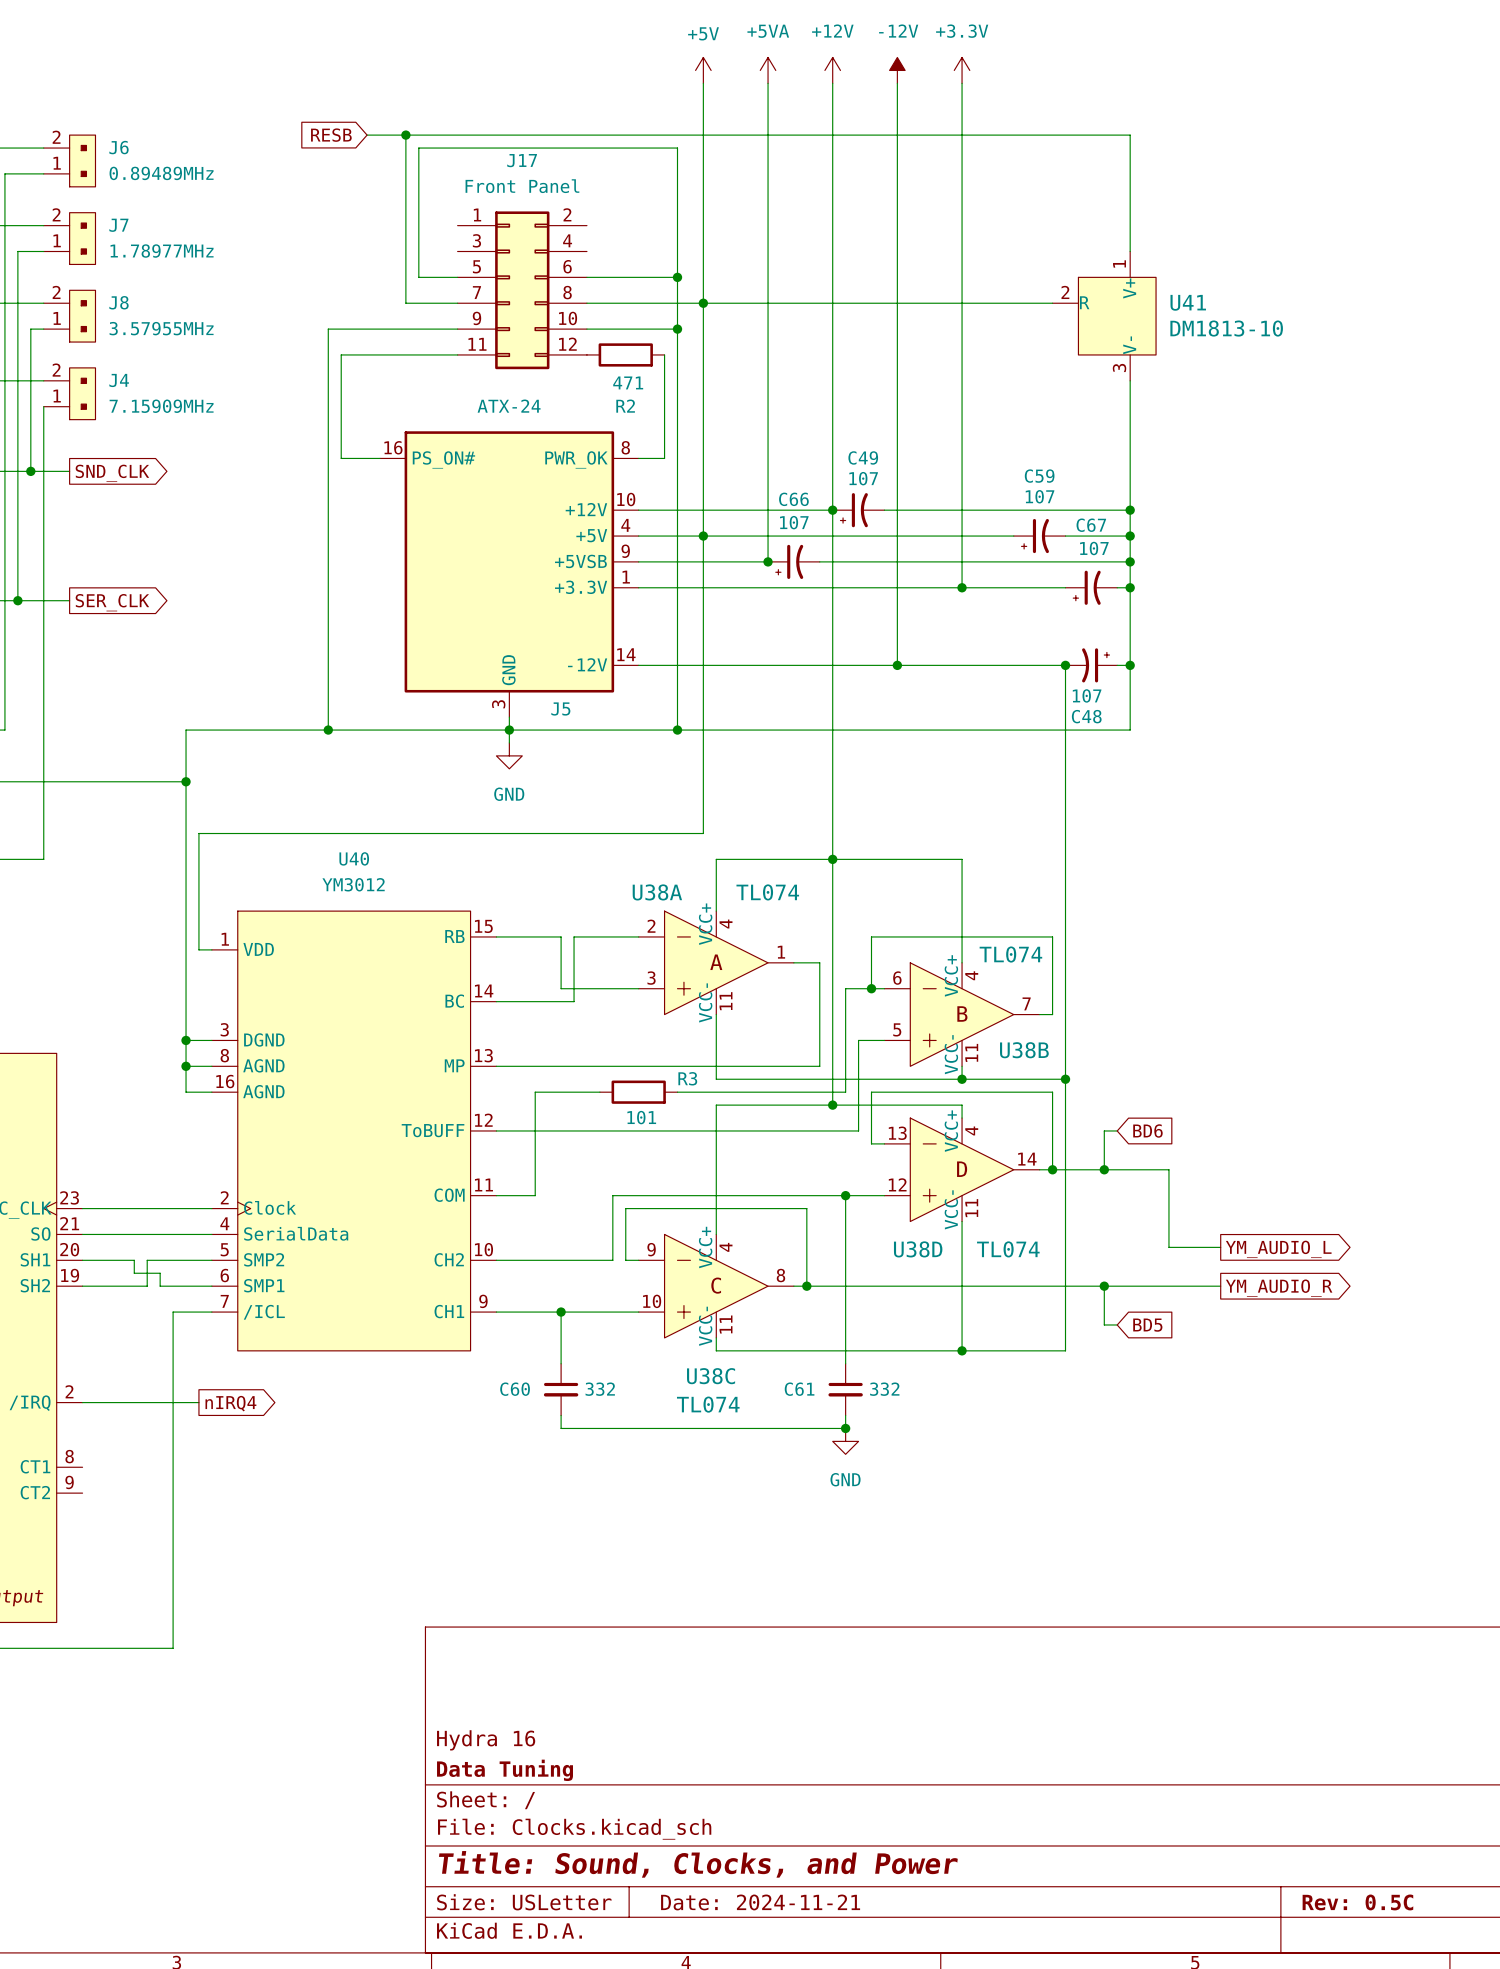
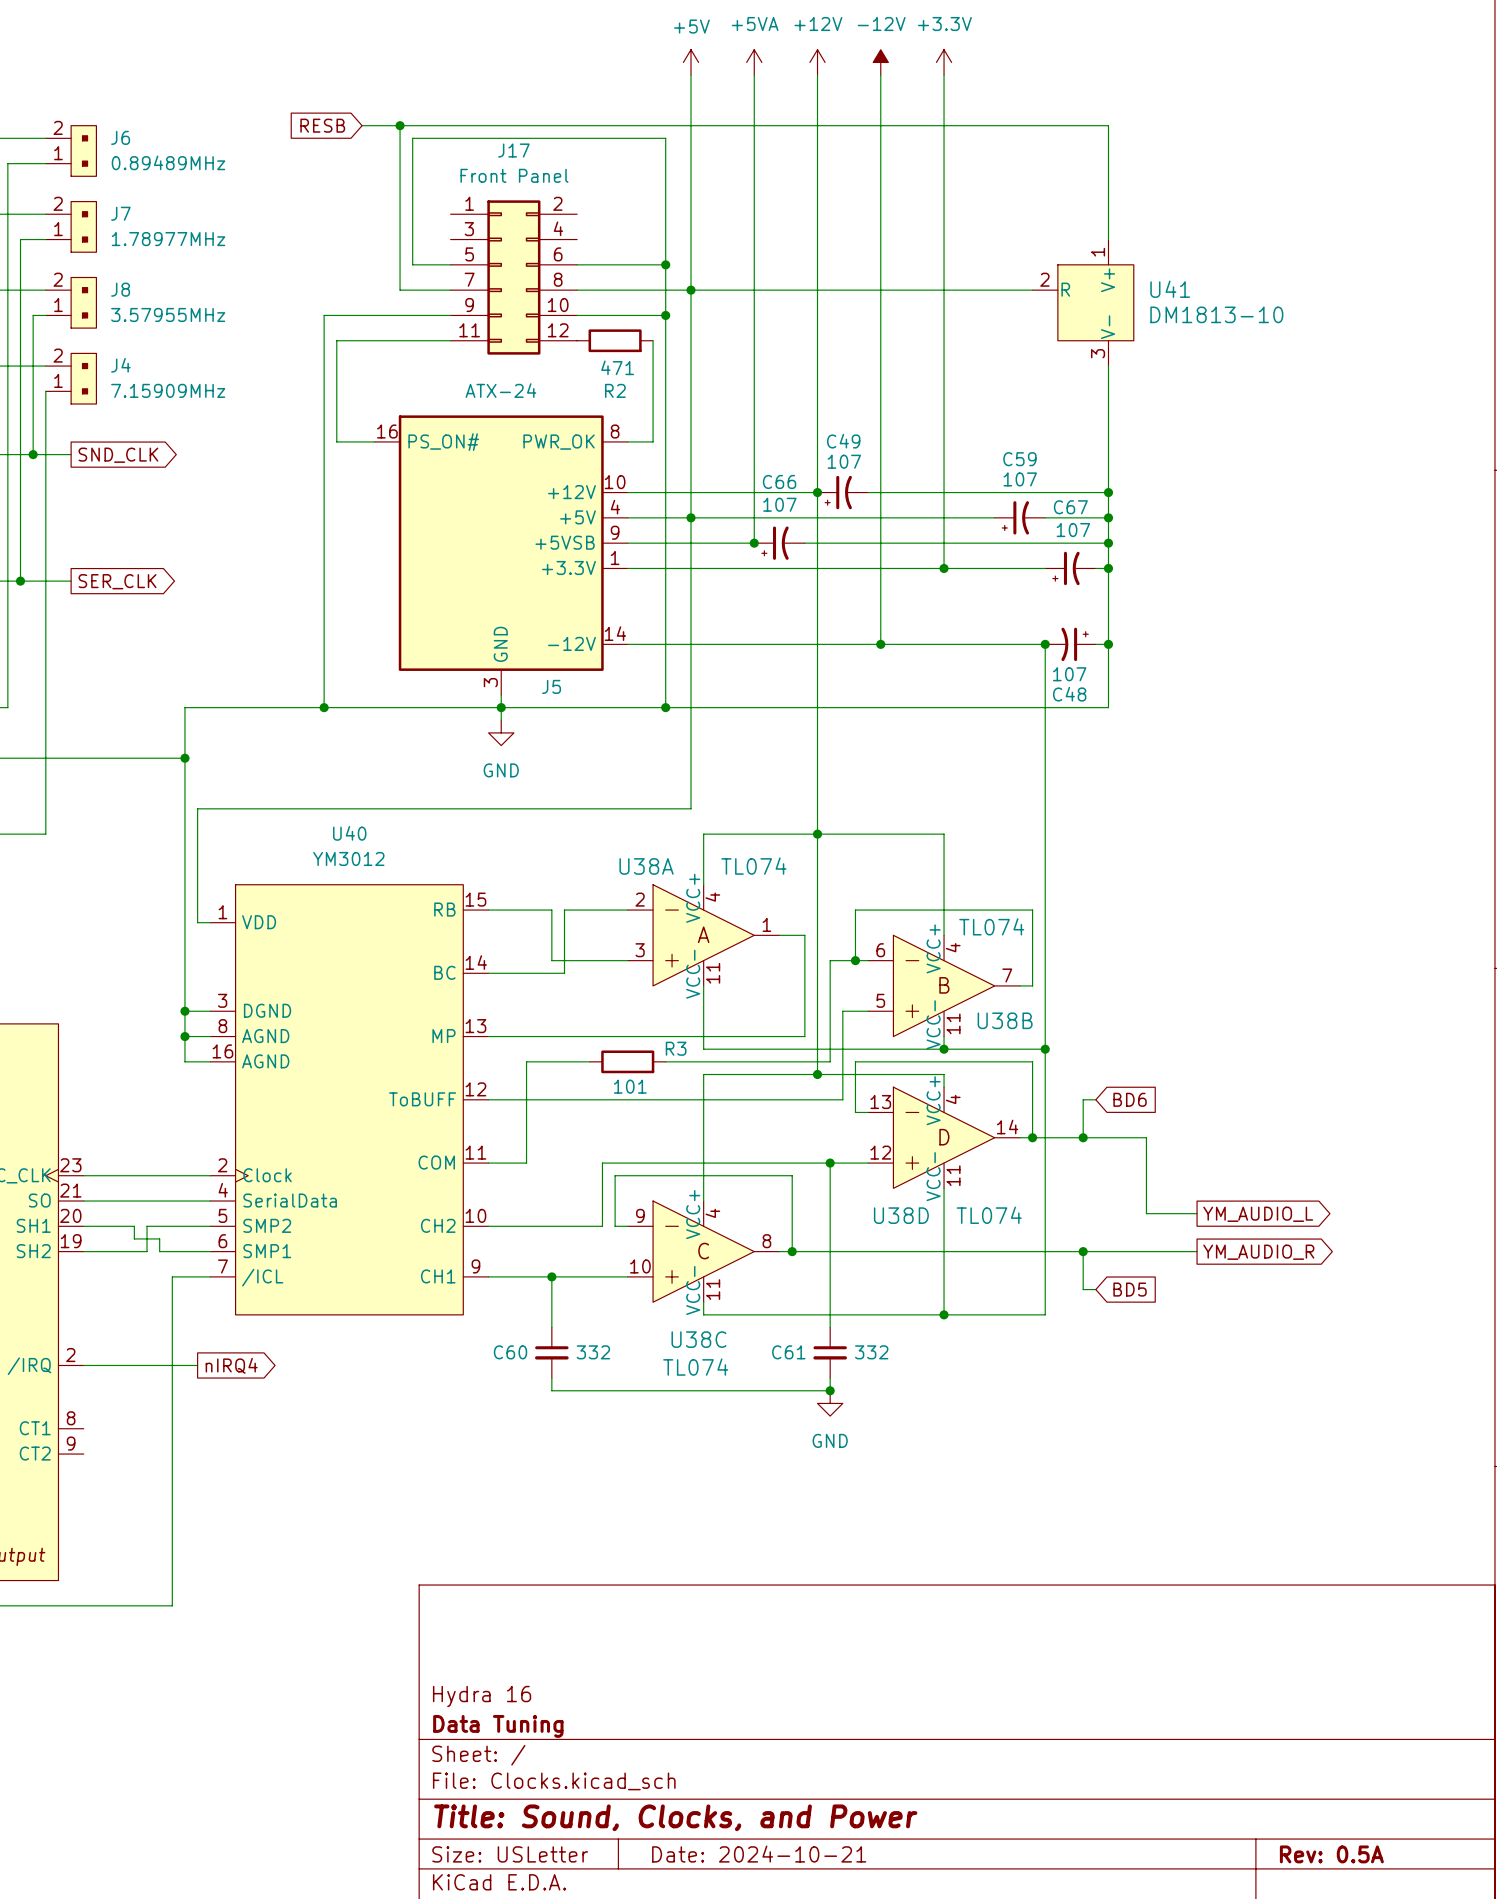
title block: Date: 2024-11-21 (760, 1902) -> Date: 2024-10-21 (759, 1854)
title block: Rev: 0.5C (1357, 1902) -> Rev: 0.5A (1331, 1854)

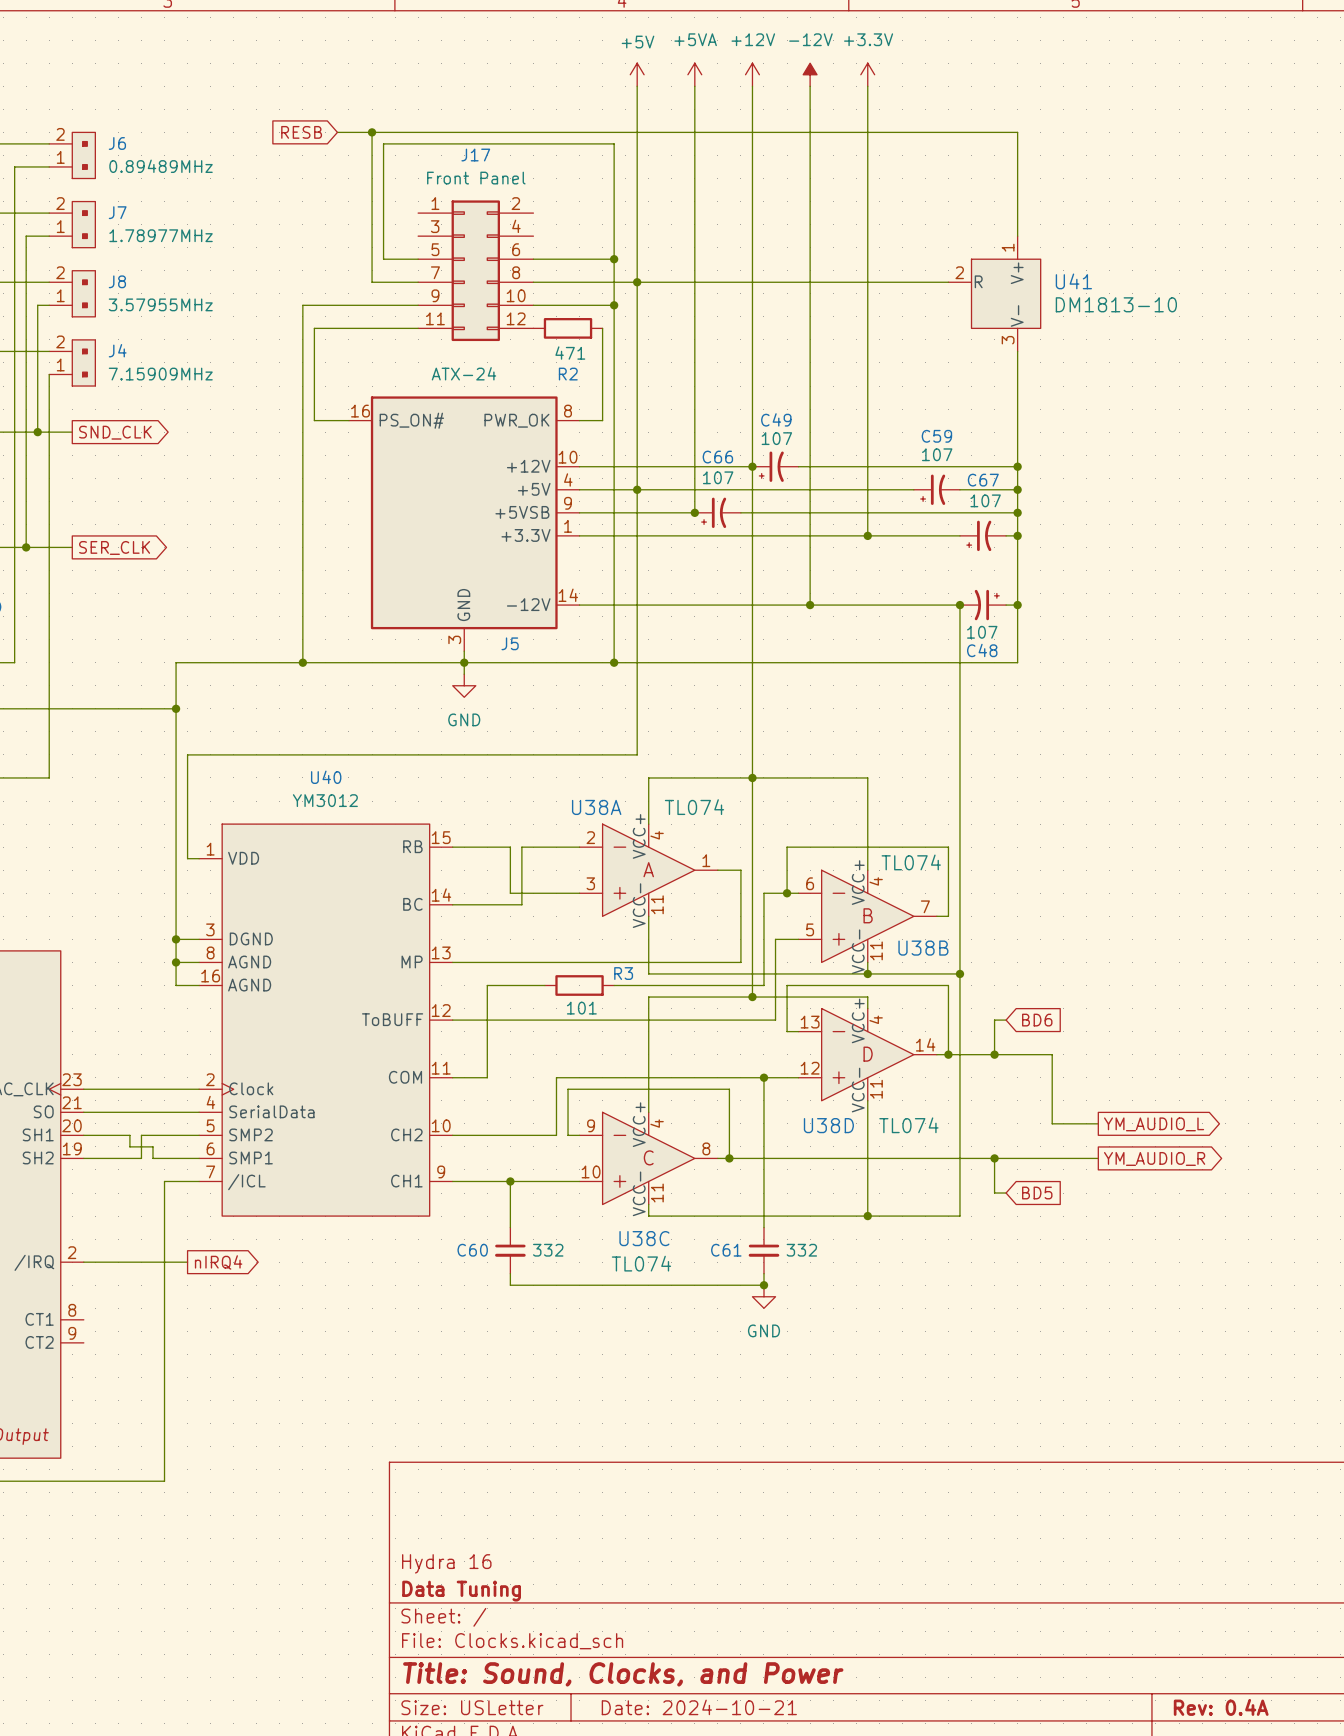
title block: Rev: 0.5A (1331, 1854) -> Rev: 0.4A (1221, 1707)

